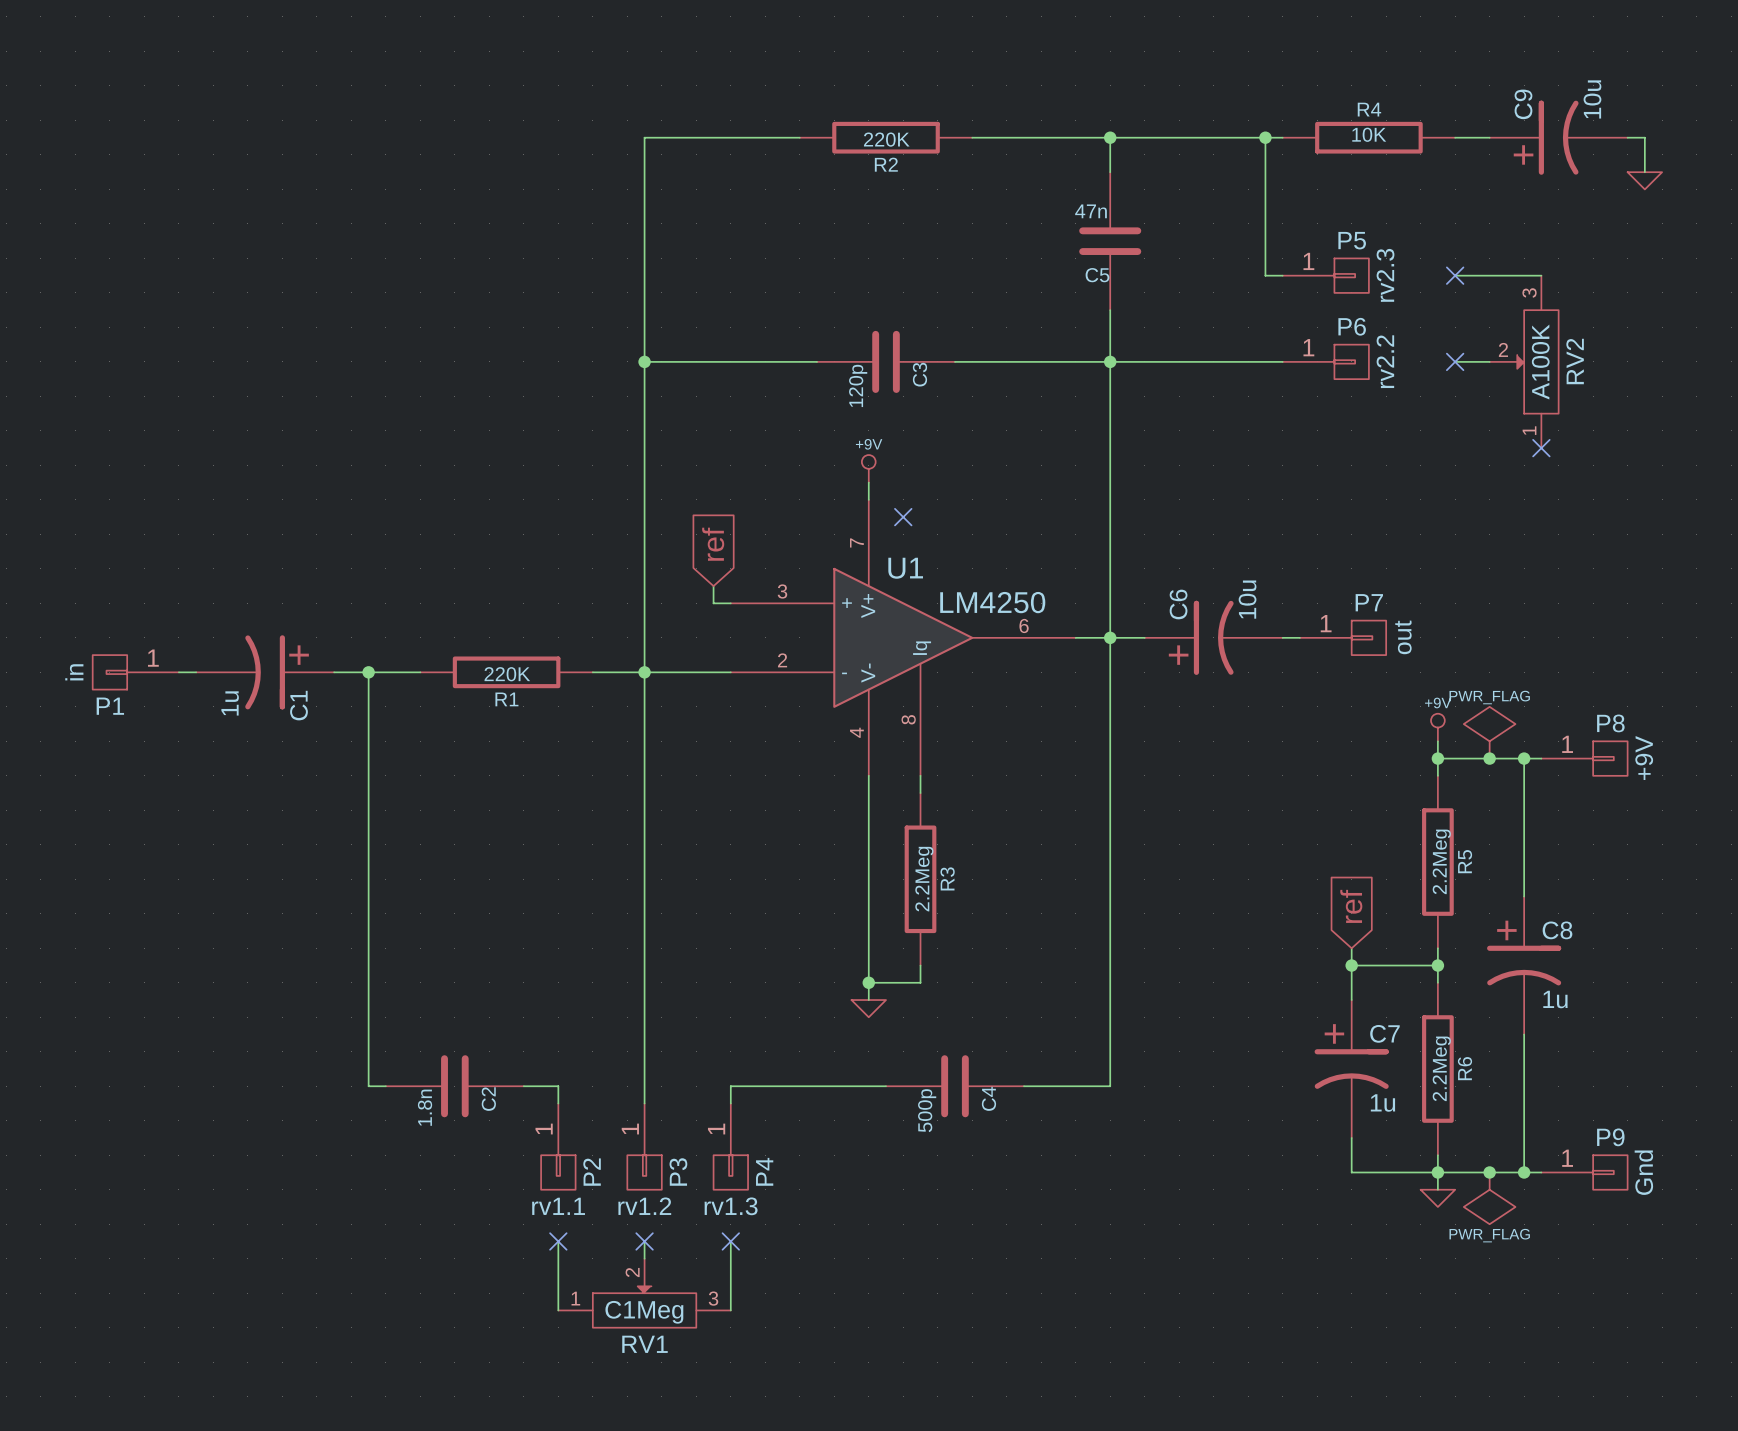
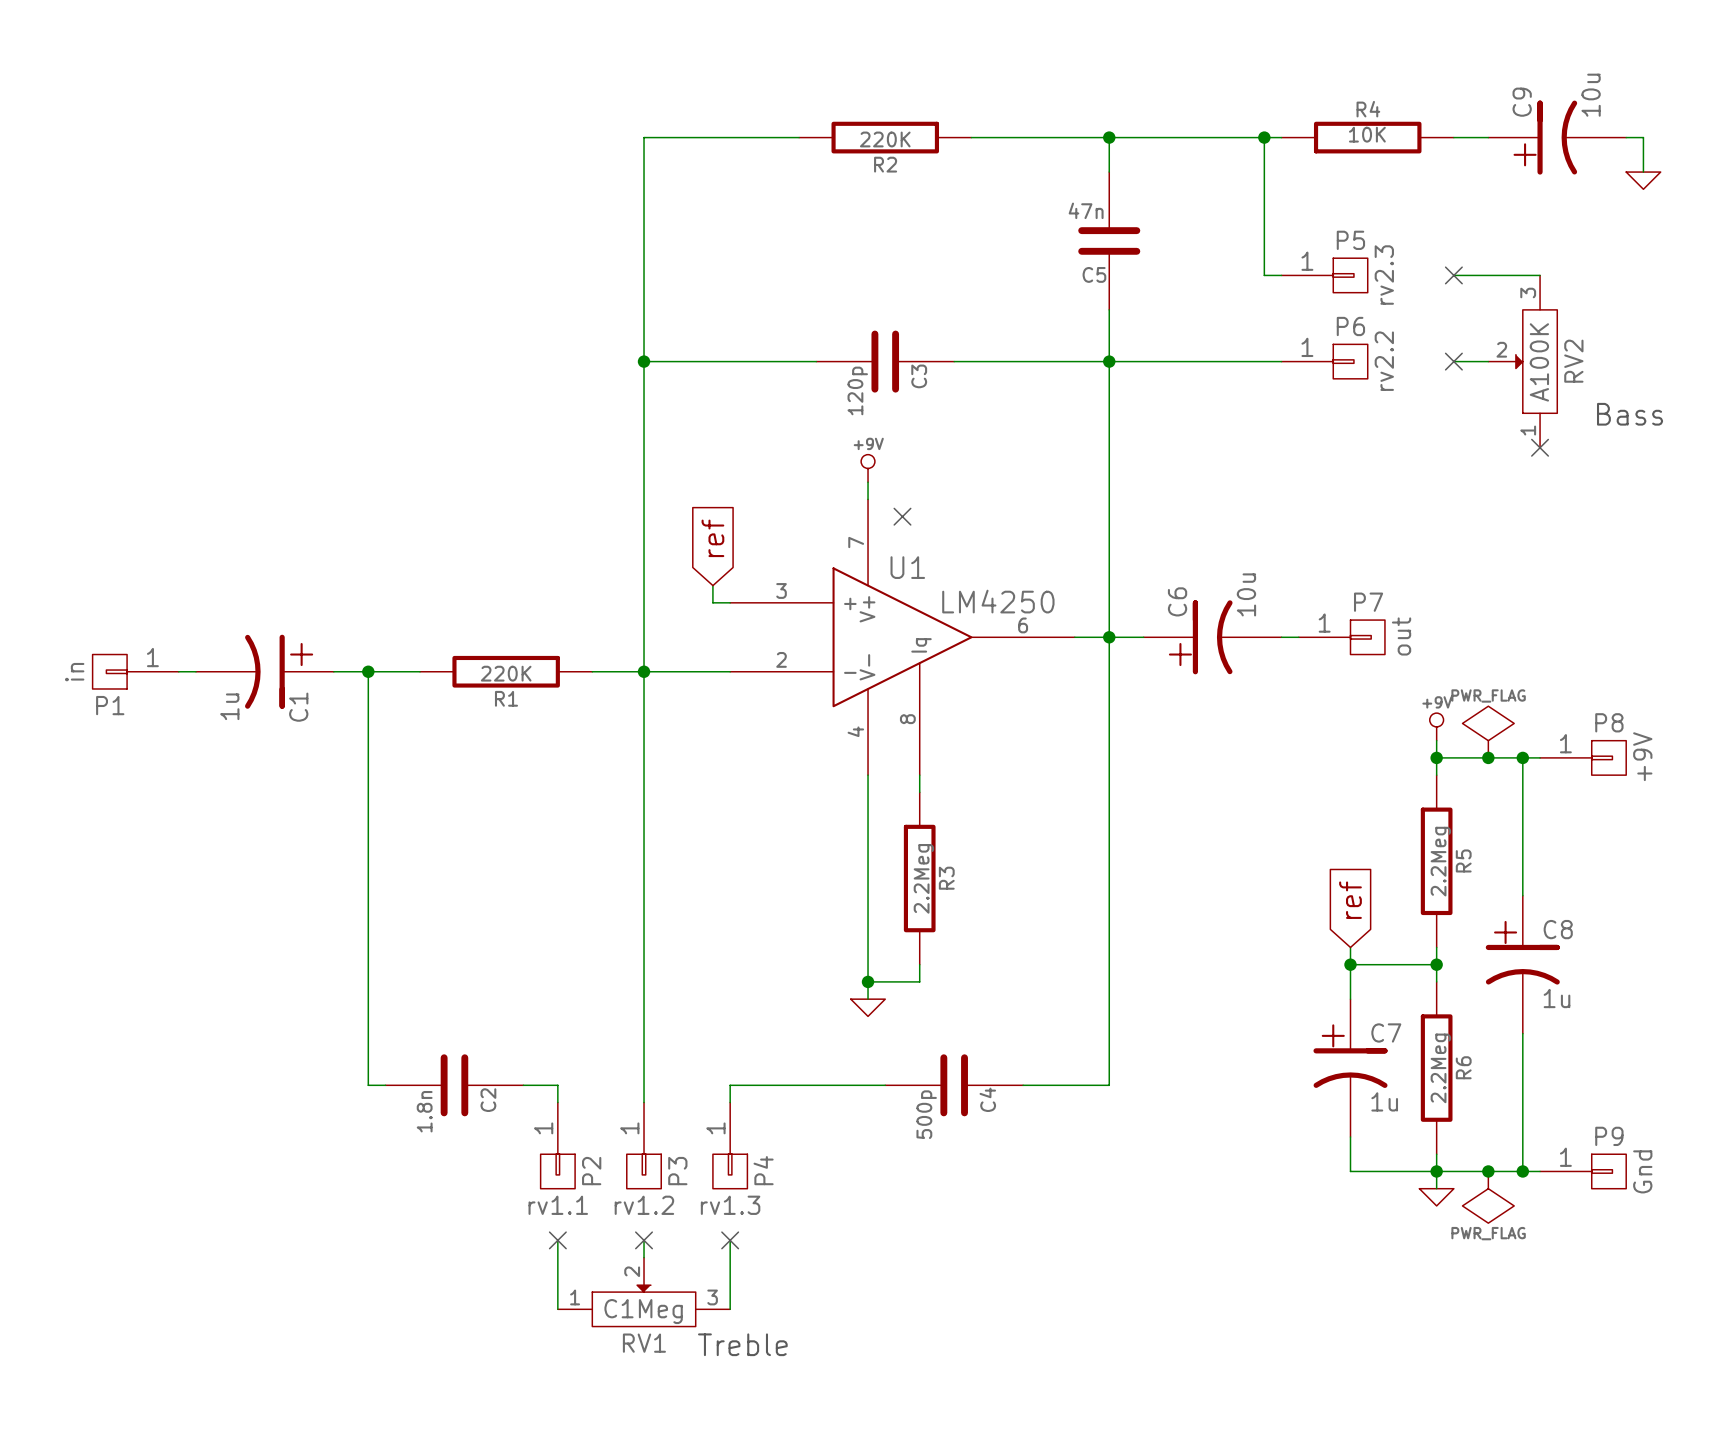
text: none -> Bass (1630, 414)
text: none -> Treble (742, 1344)

